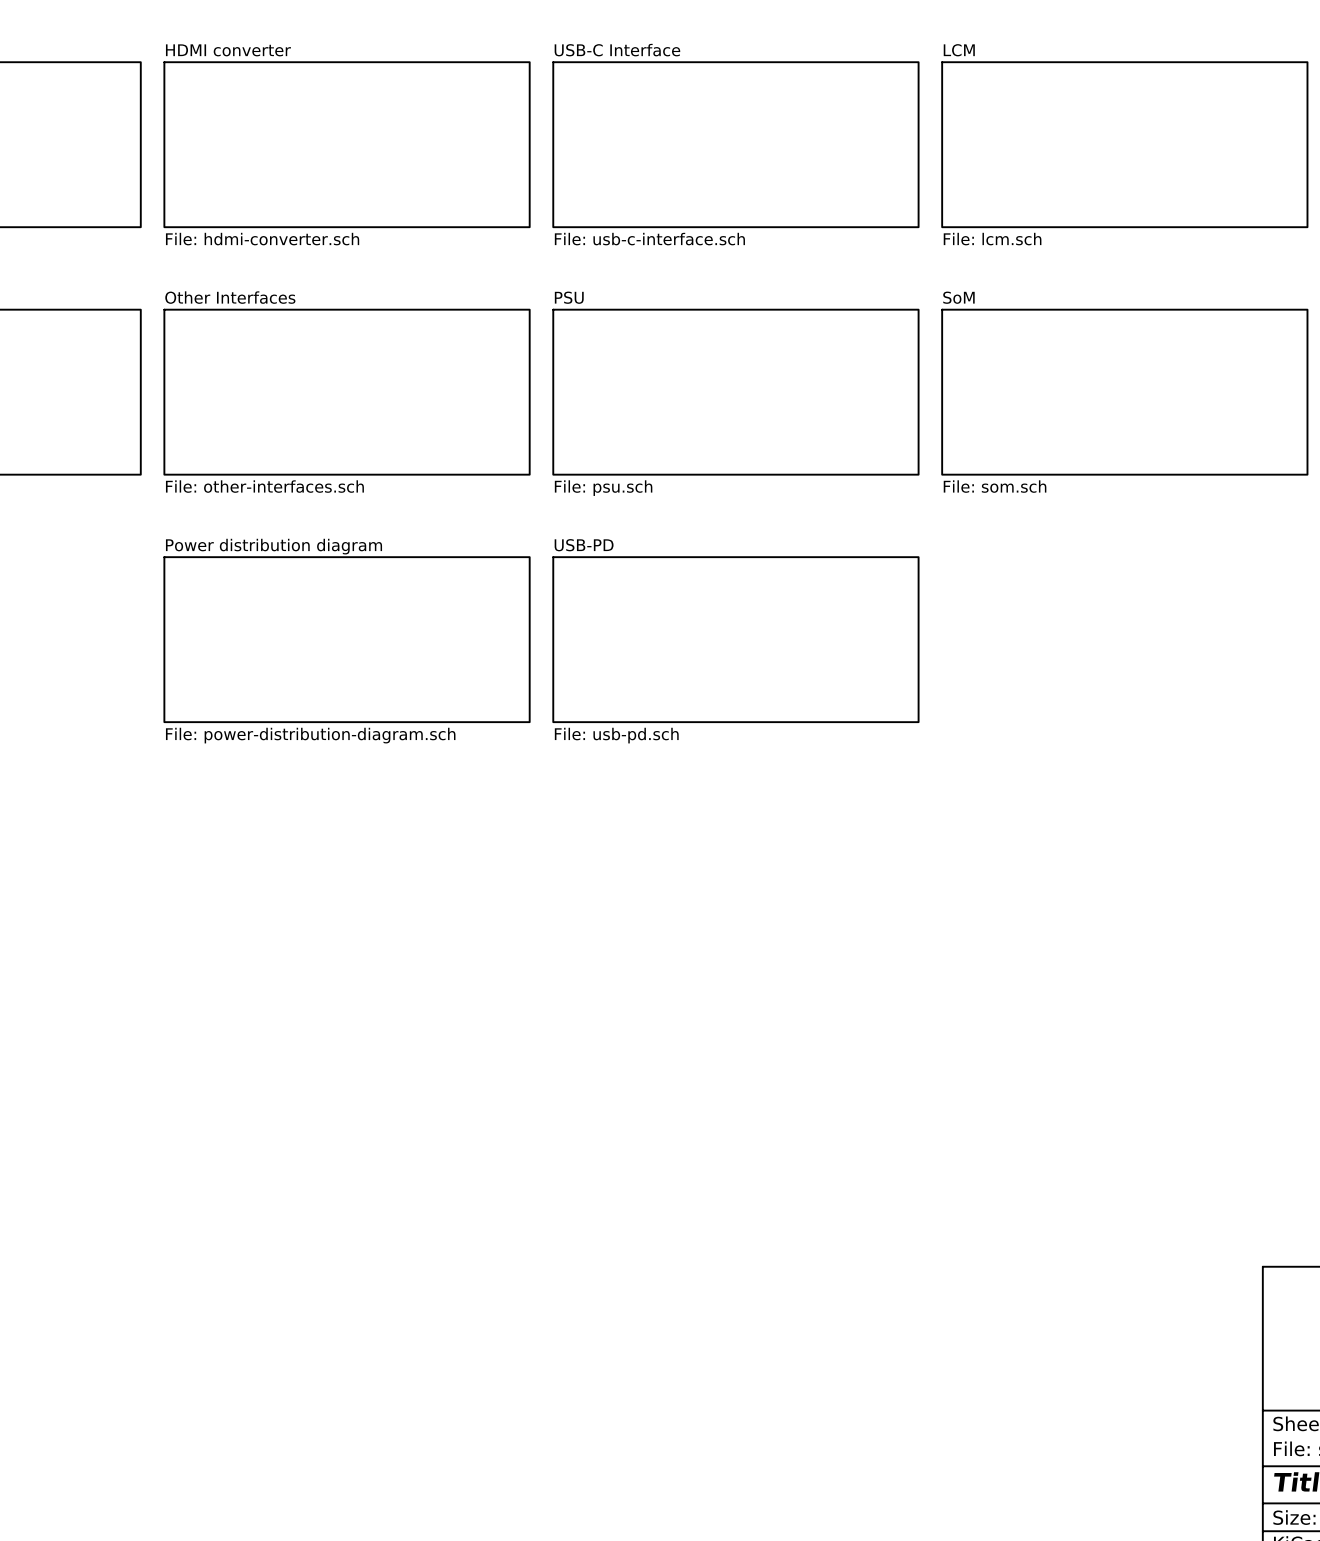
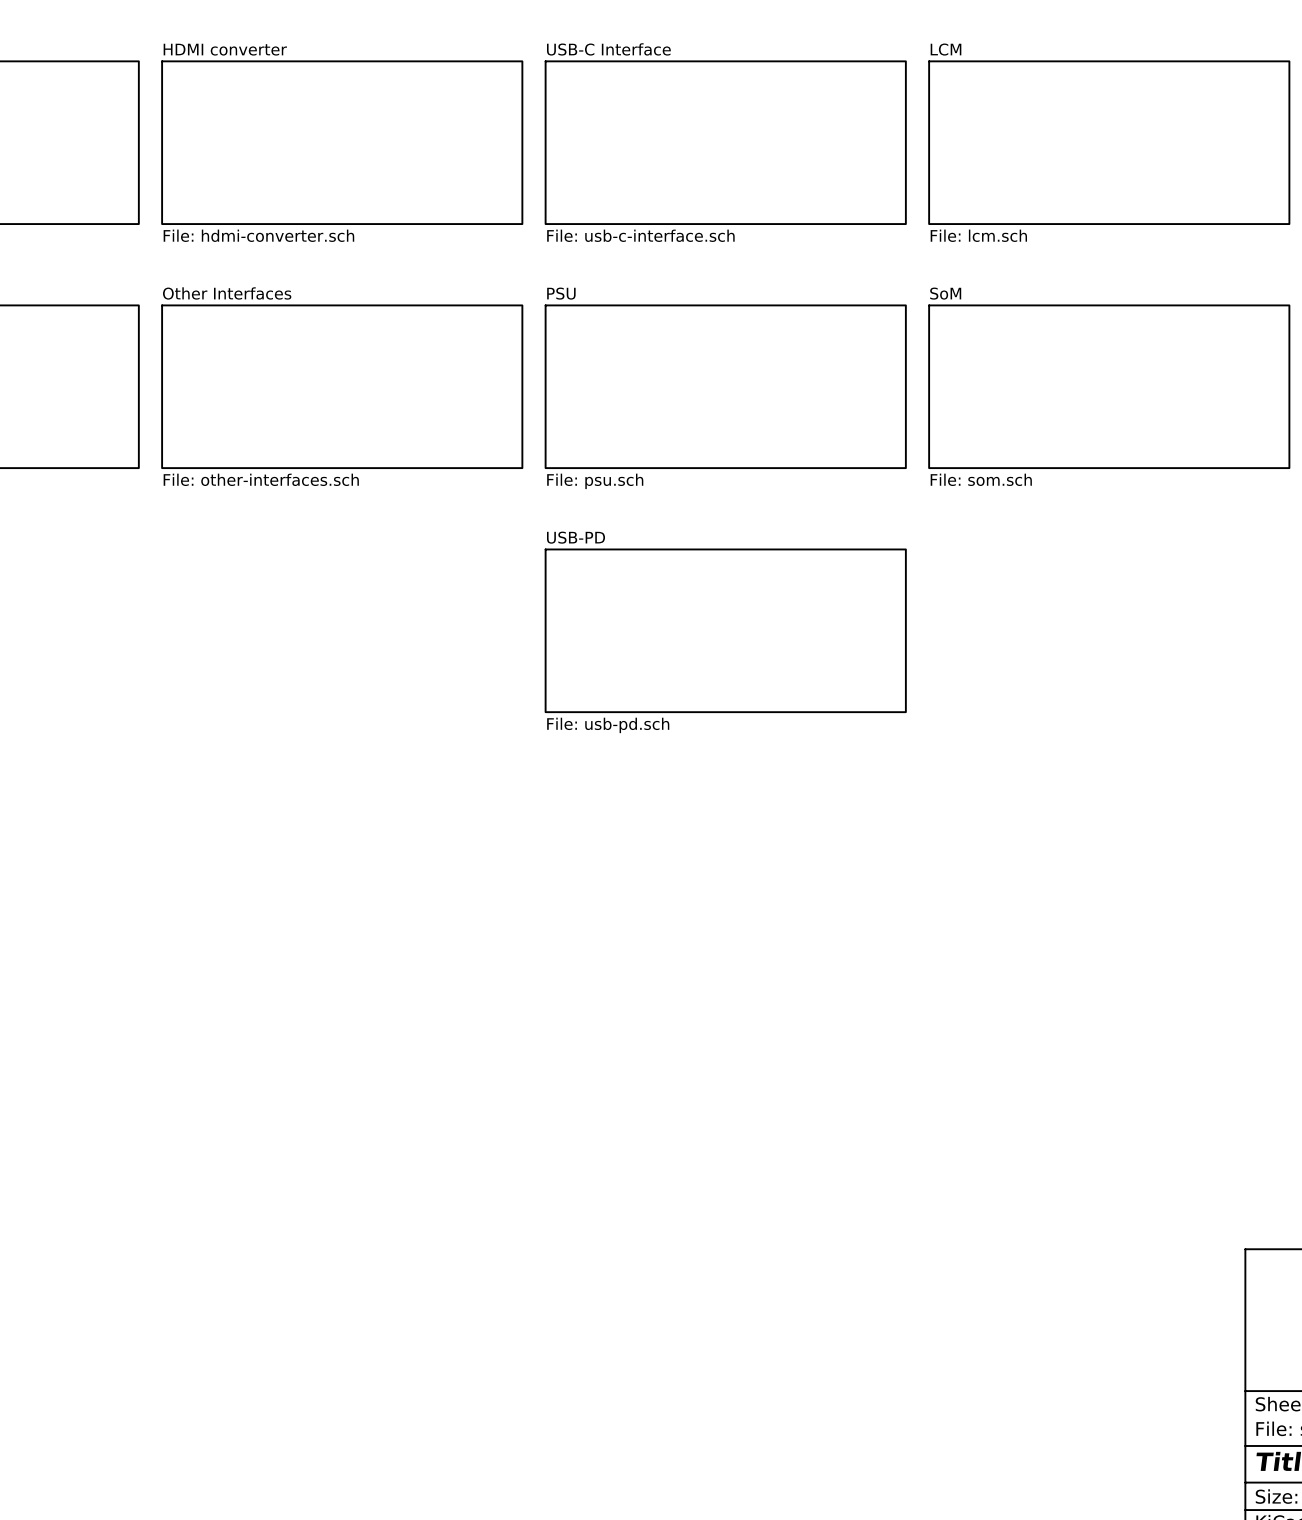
sheet Power distribution diagram: File: power-distribution-diagram.sch (347, 639) -> none

